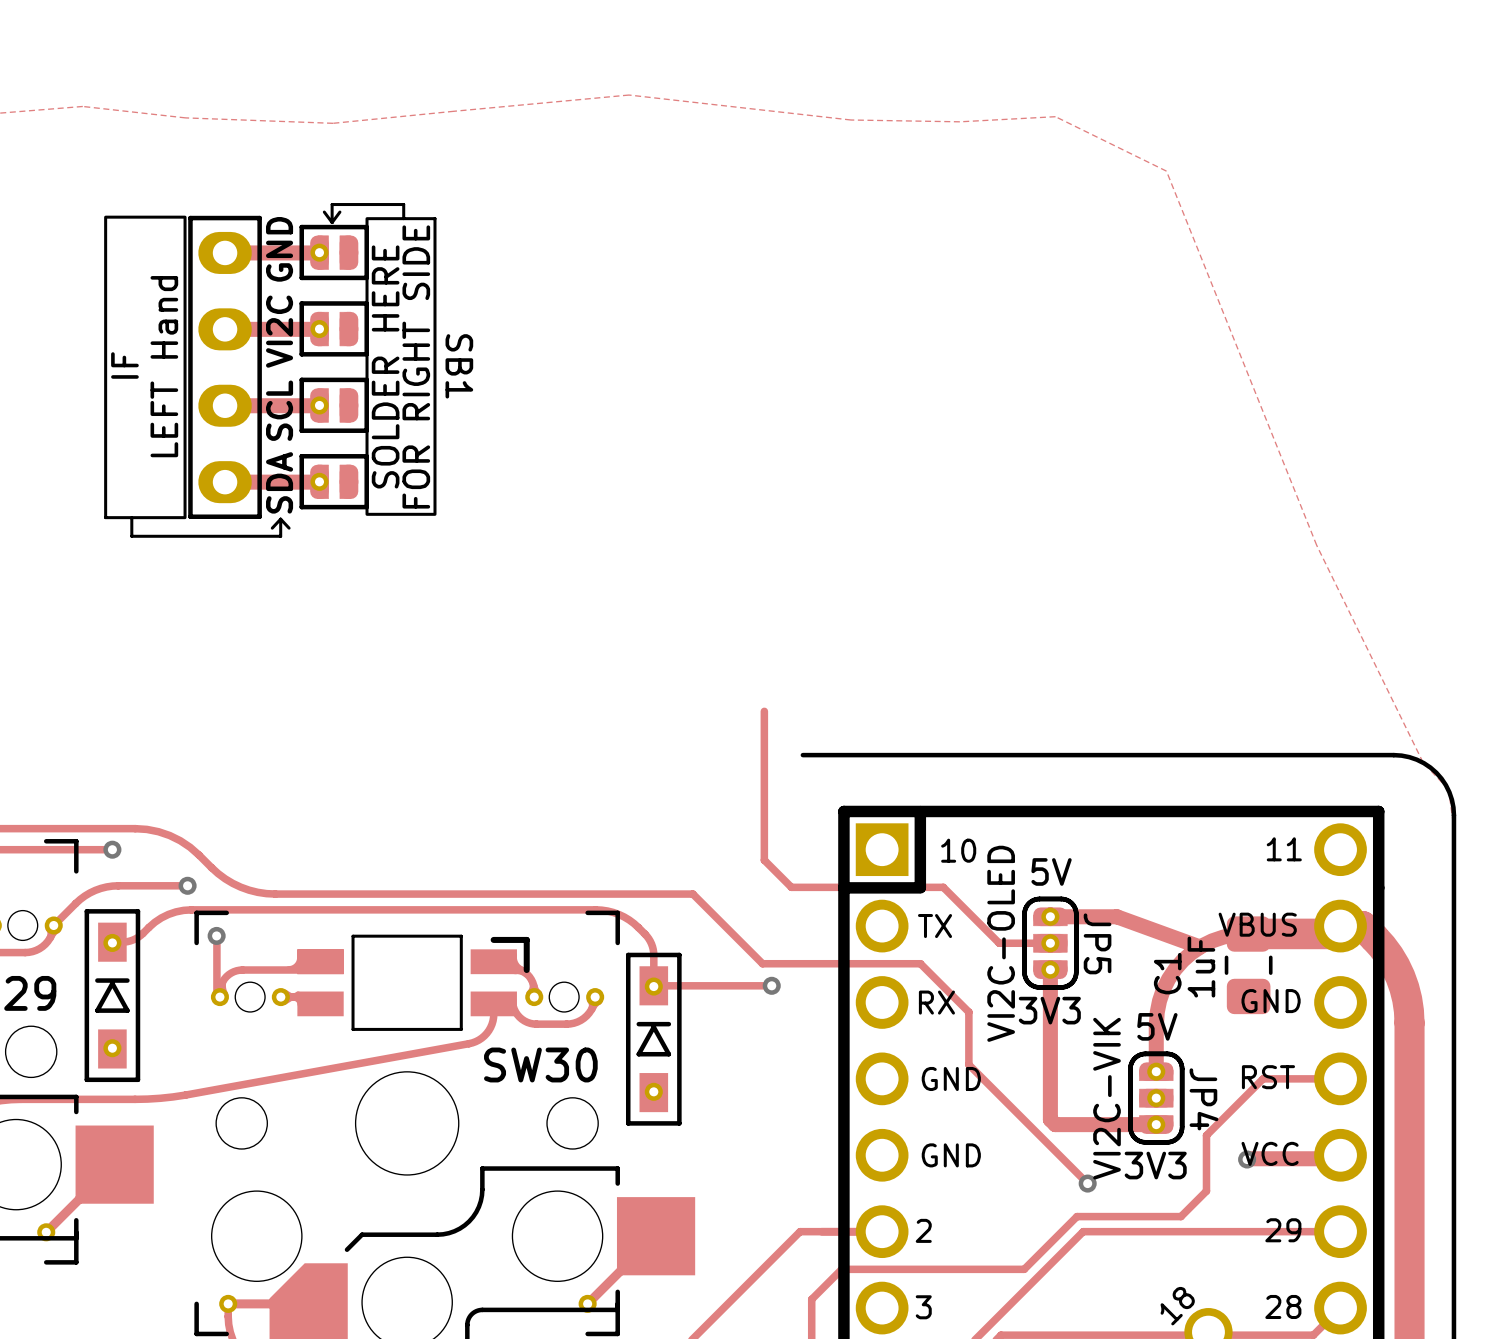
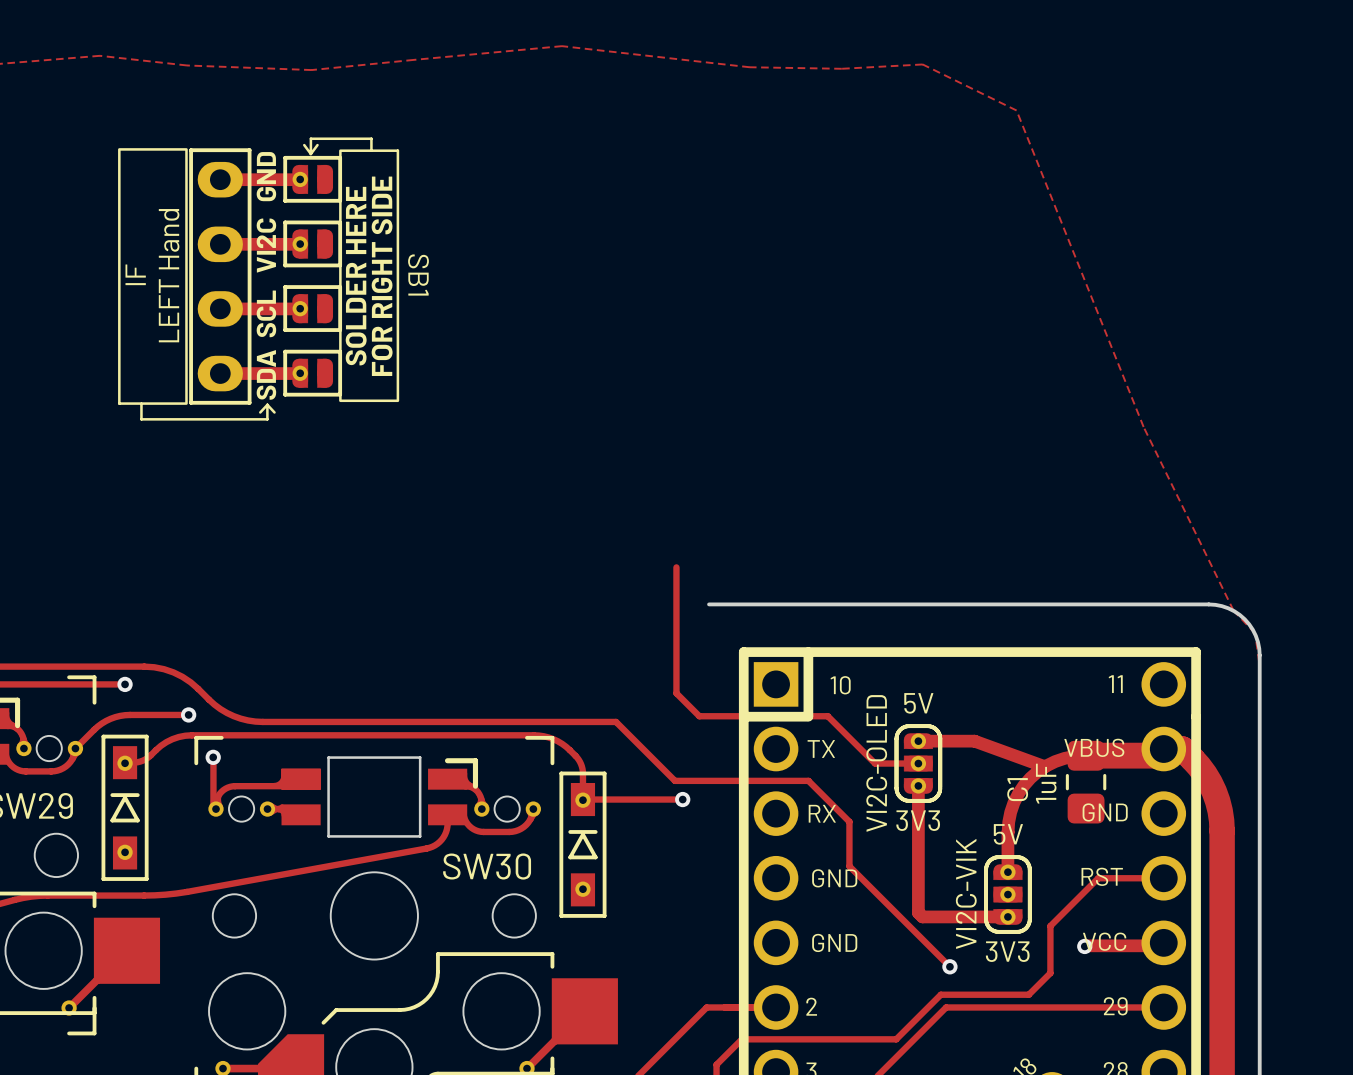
part text: JP5 (1097, 943) -> none
part text: JP4 (1204, 1099) -> none

